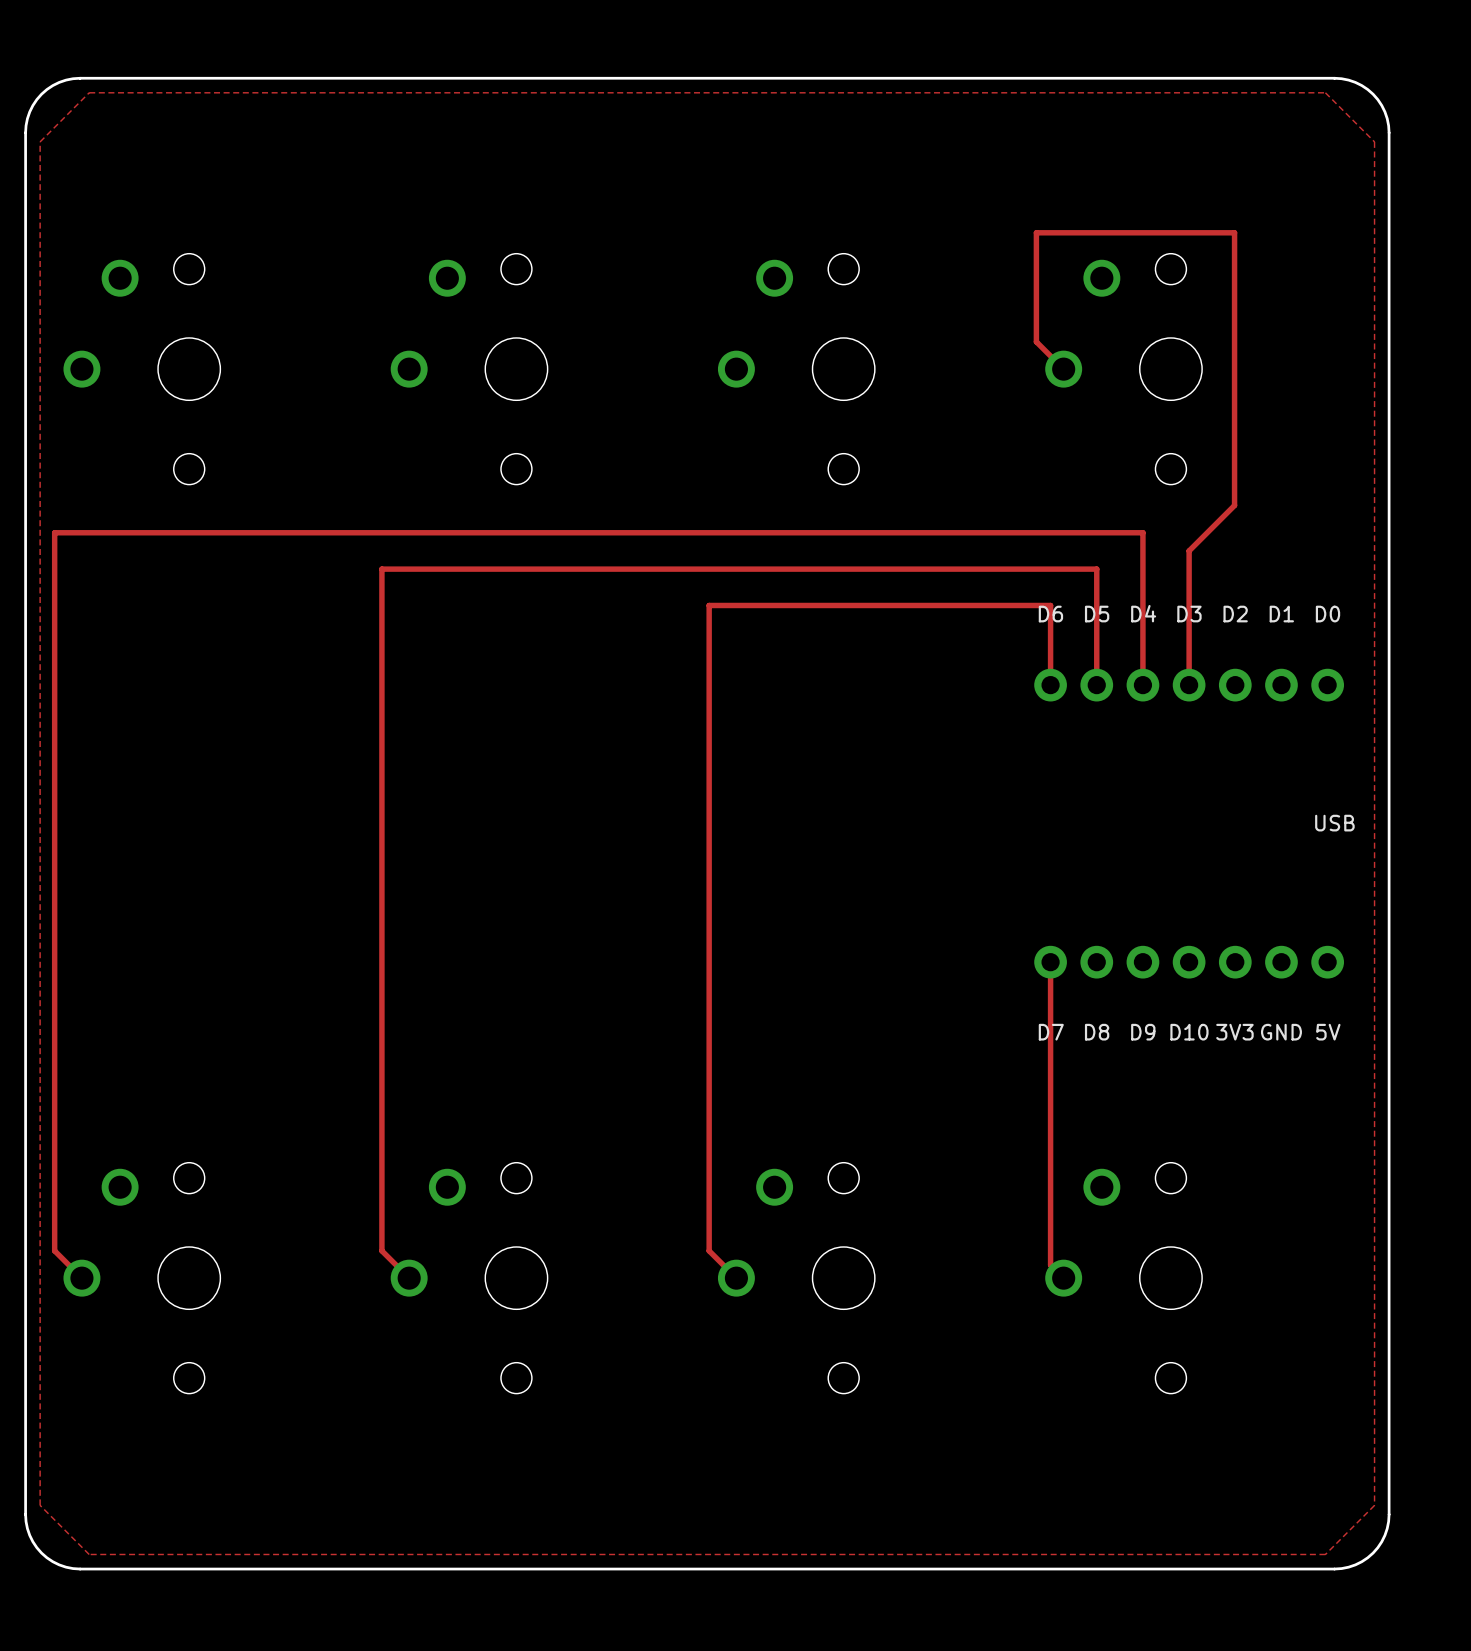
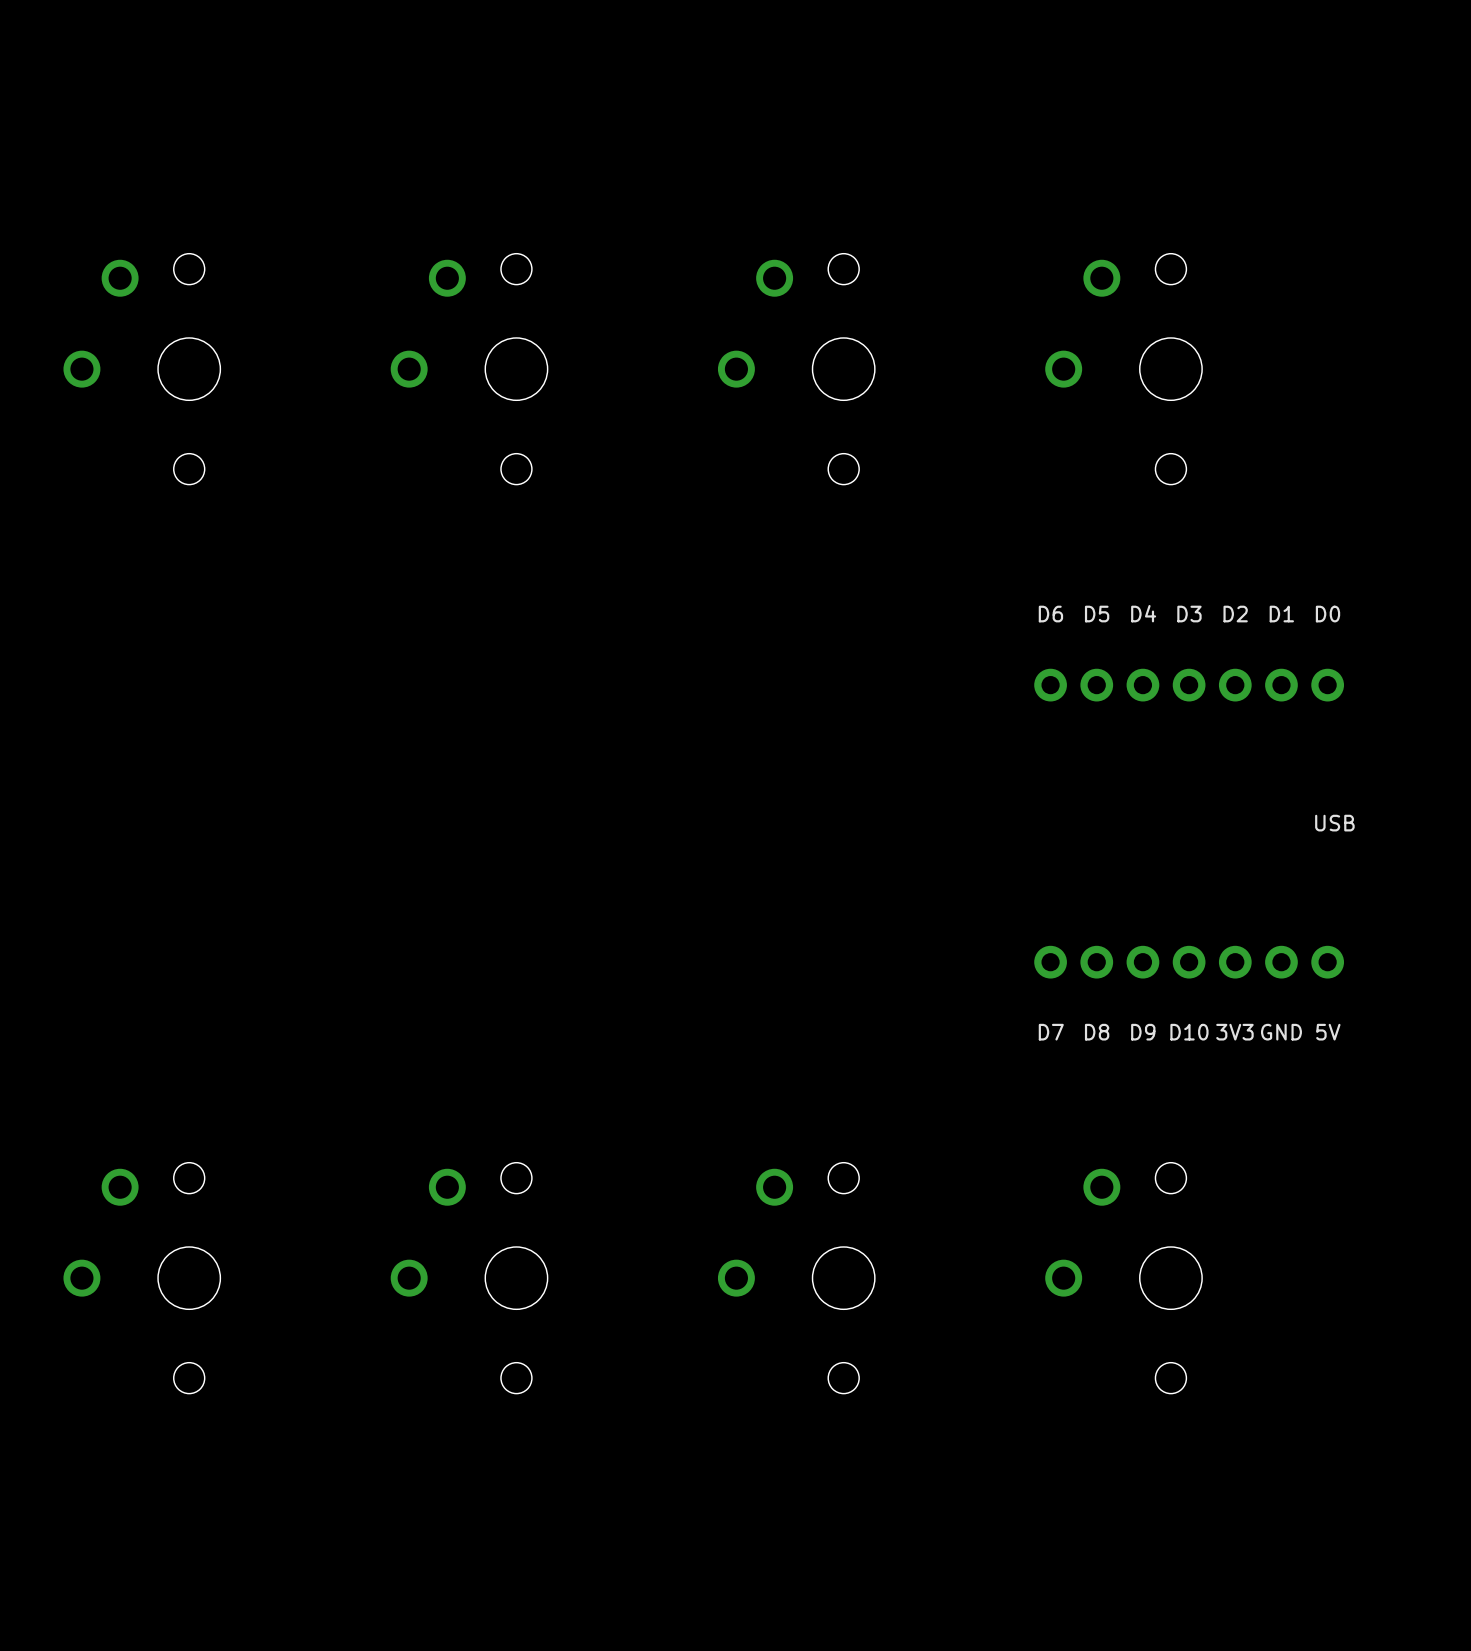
board edge: (80, 78) (1334, 78) (1348, 80) (1361, 85) (1377, 99) (1387, 118) (1389, 132) (1389, 1514) (1387, 1528) (1381, 1541) (1367, 1557) (1355, 1564) (1334, 1569) (80, 1569) (59, 1564) (46, 1557) (36, 1547) (29, 1535) (25, 1514) (25, 132) (29, 111) (41, 94) (59, 82) (80, 78) -> none
zone outline: (89, 92) (1325, 92) (1374, 141) (1374, 1505) (1325, 1554) (89, 1554) (40, 1505) (40, 141) (89, 92) -> none
track: (1063, 369) (1036, 341) (1036, 232) (1234, 232) (1234, 505) (1189, 550) (1189, 685) -> none
track: (1050, 685) (1050, 605) (709, 605) (709, 1250) (736, 1278) -> none
track: (1096, 685) (1096, 569) (381, 569) (381, 1250) (409, 1278) -> none
track: (1142, 685) (1142, 532) (54, 532) (54, 1250) (81, 1278) -> none
track: (1050, 962) (1050, 1265) (1063, 1278) -> none

